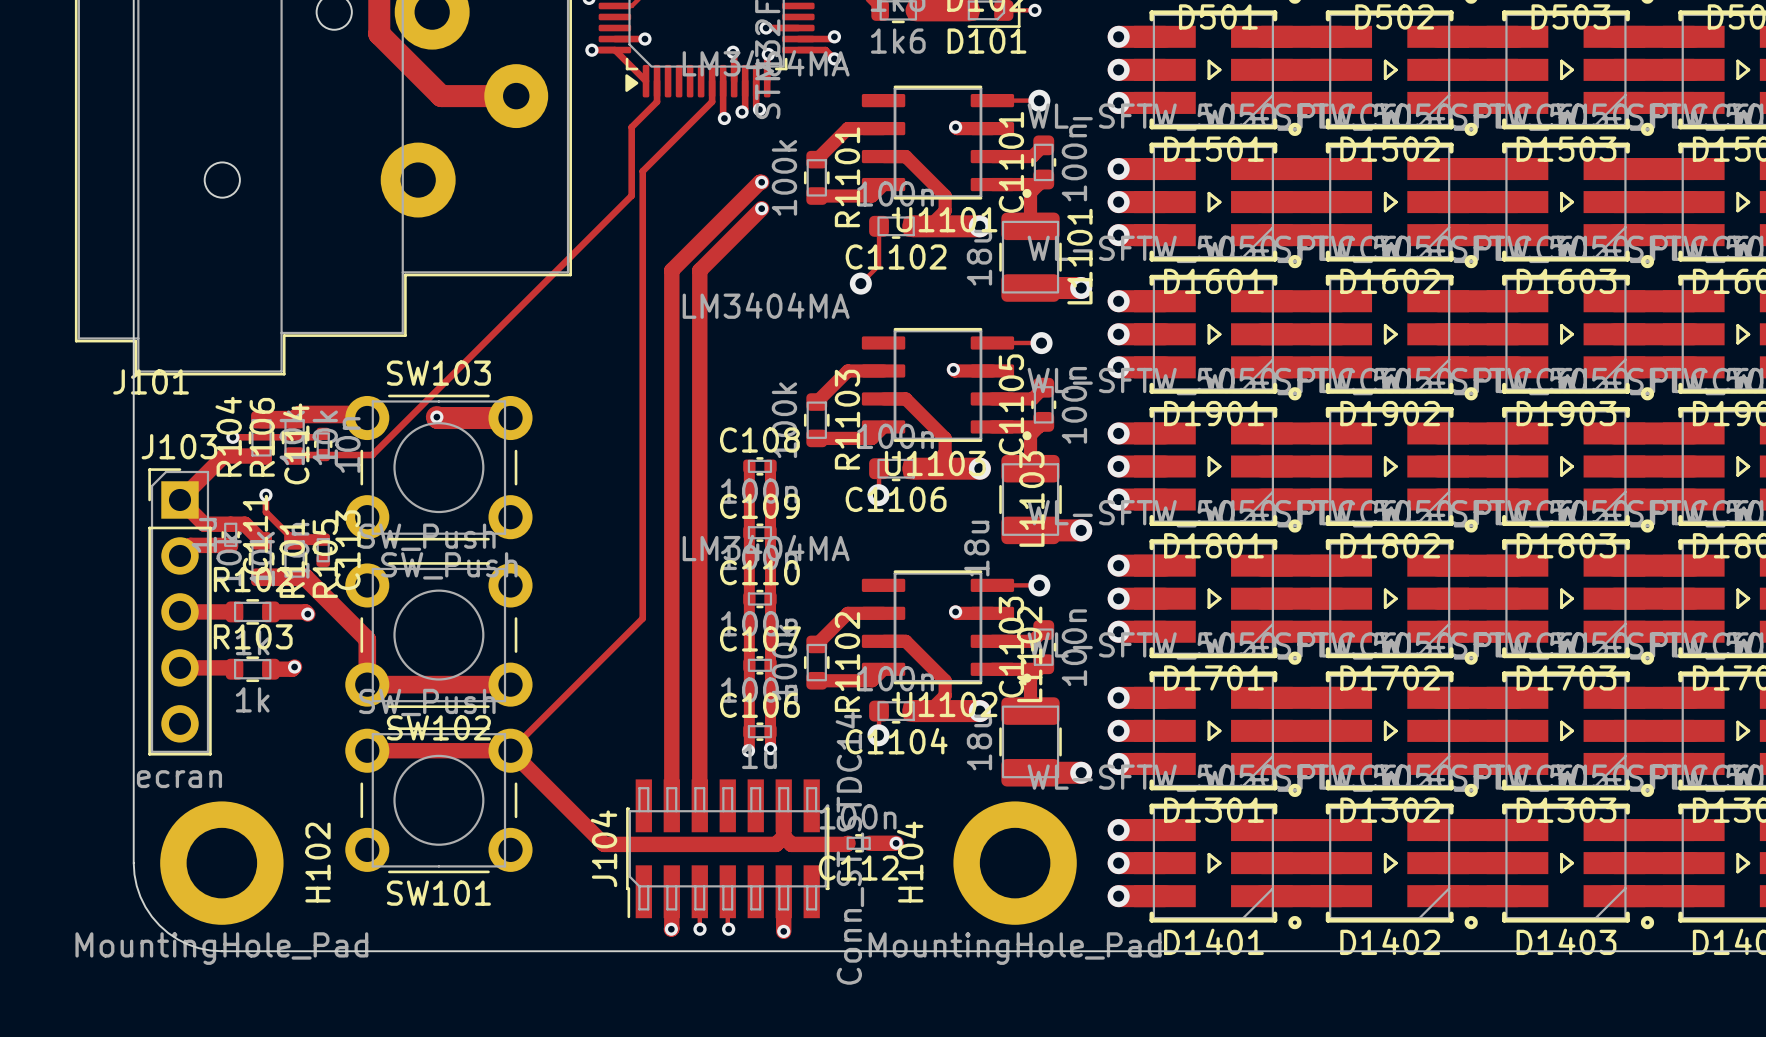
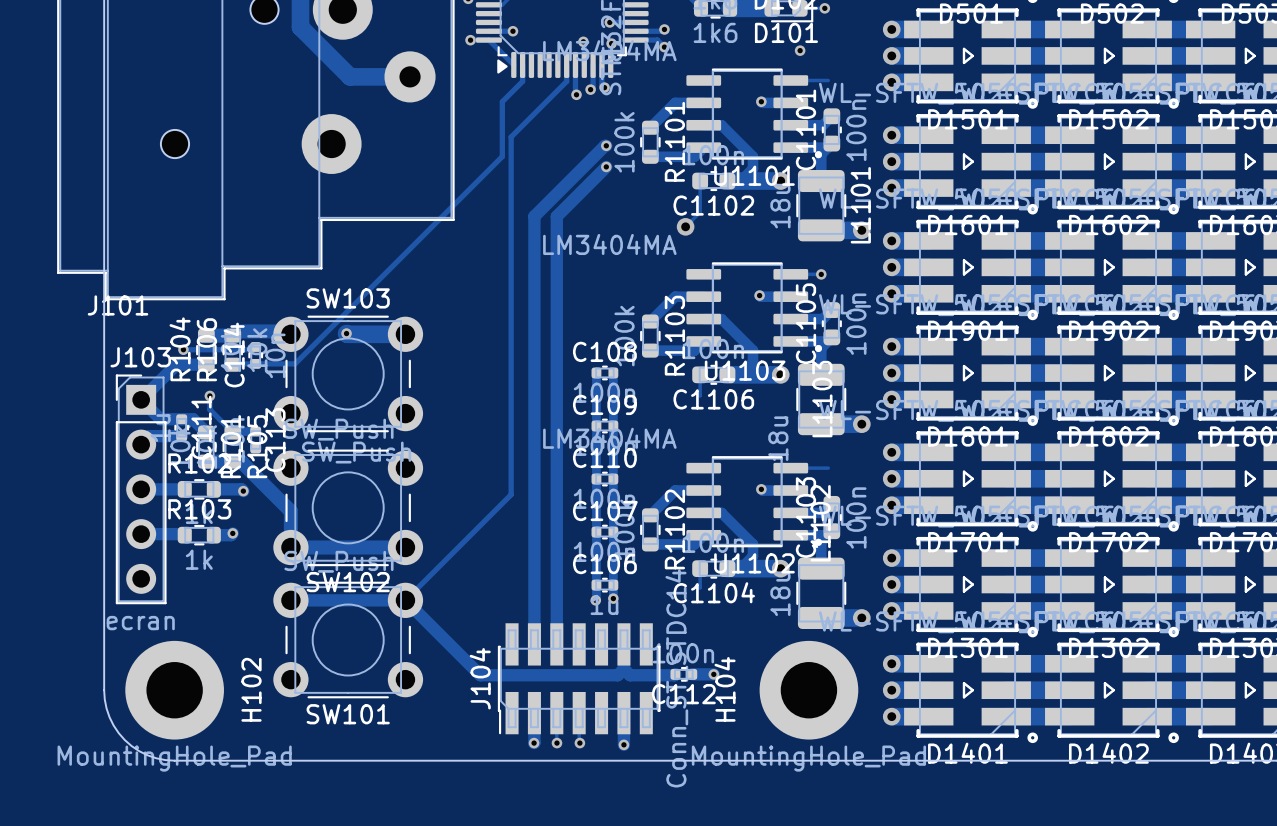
via: none -> (800, 50)
via: (1039, 100) -> none
via size: [1030, 332, 1053, 355] -> [815, 269, 827, 280]
via: (878, 495) -> none
via: (1039, 585) -> none
via: (878, 735) -> none

